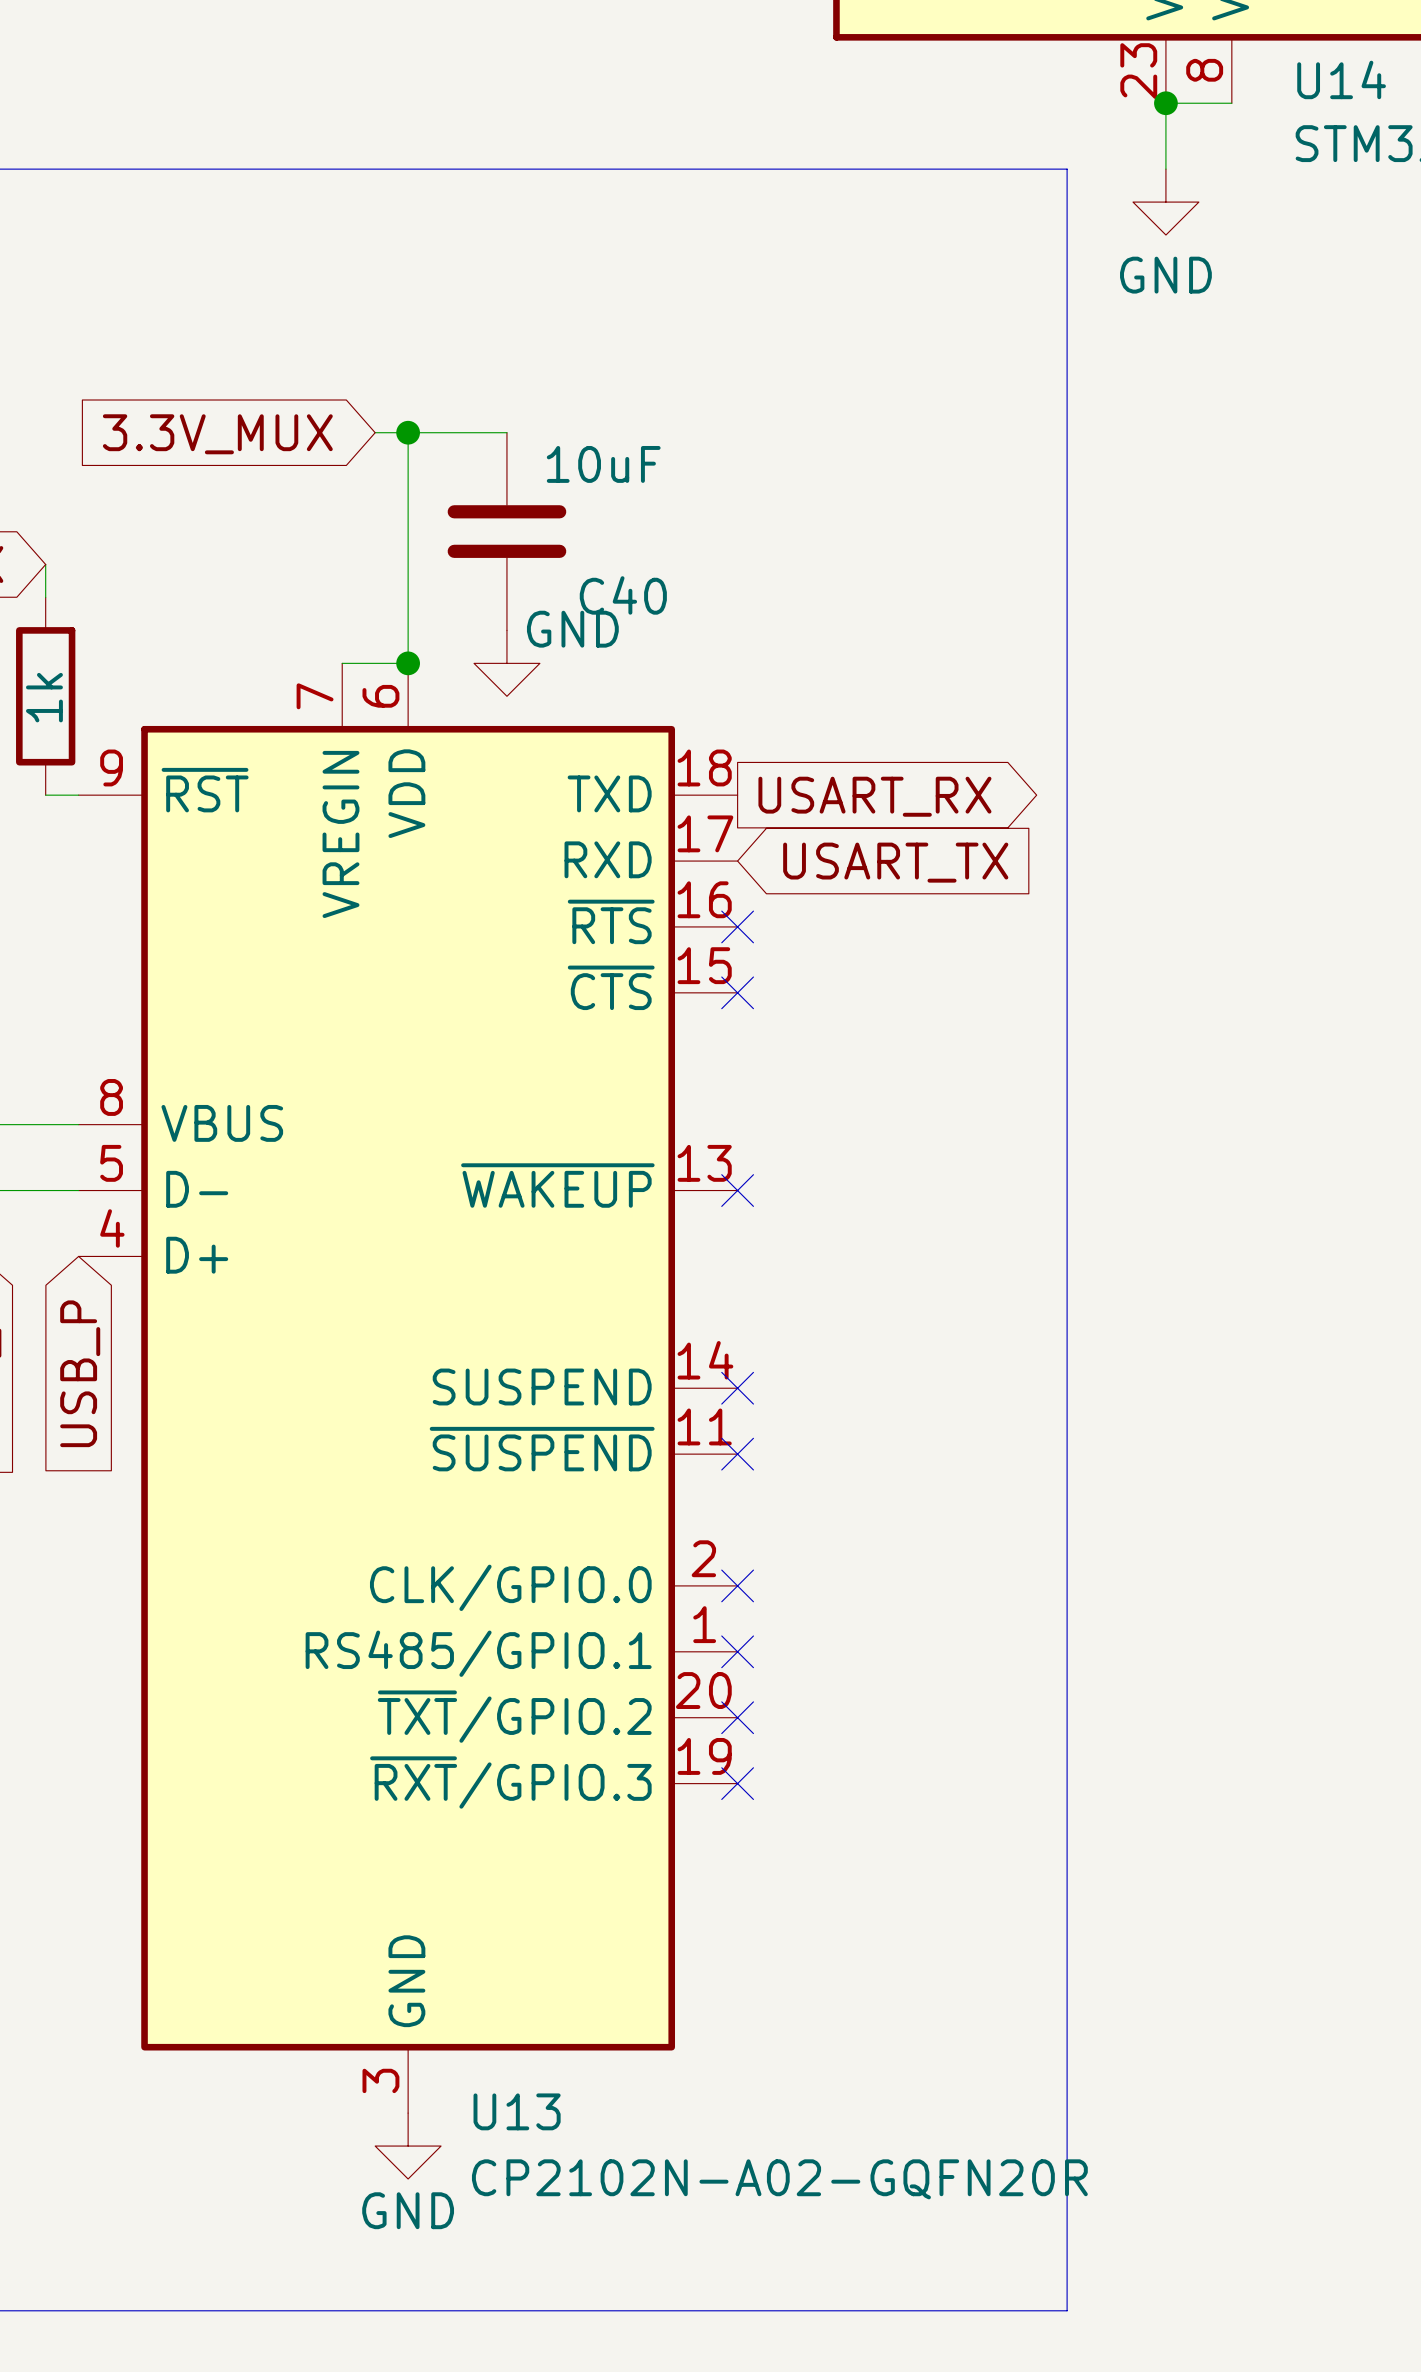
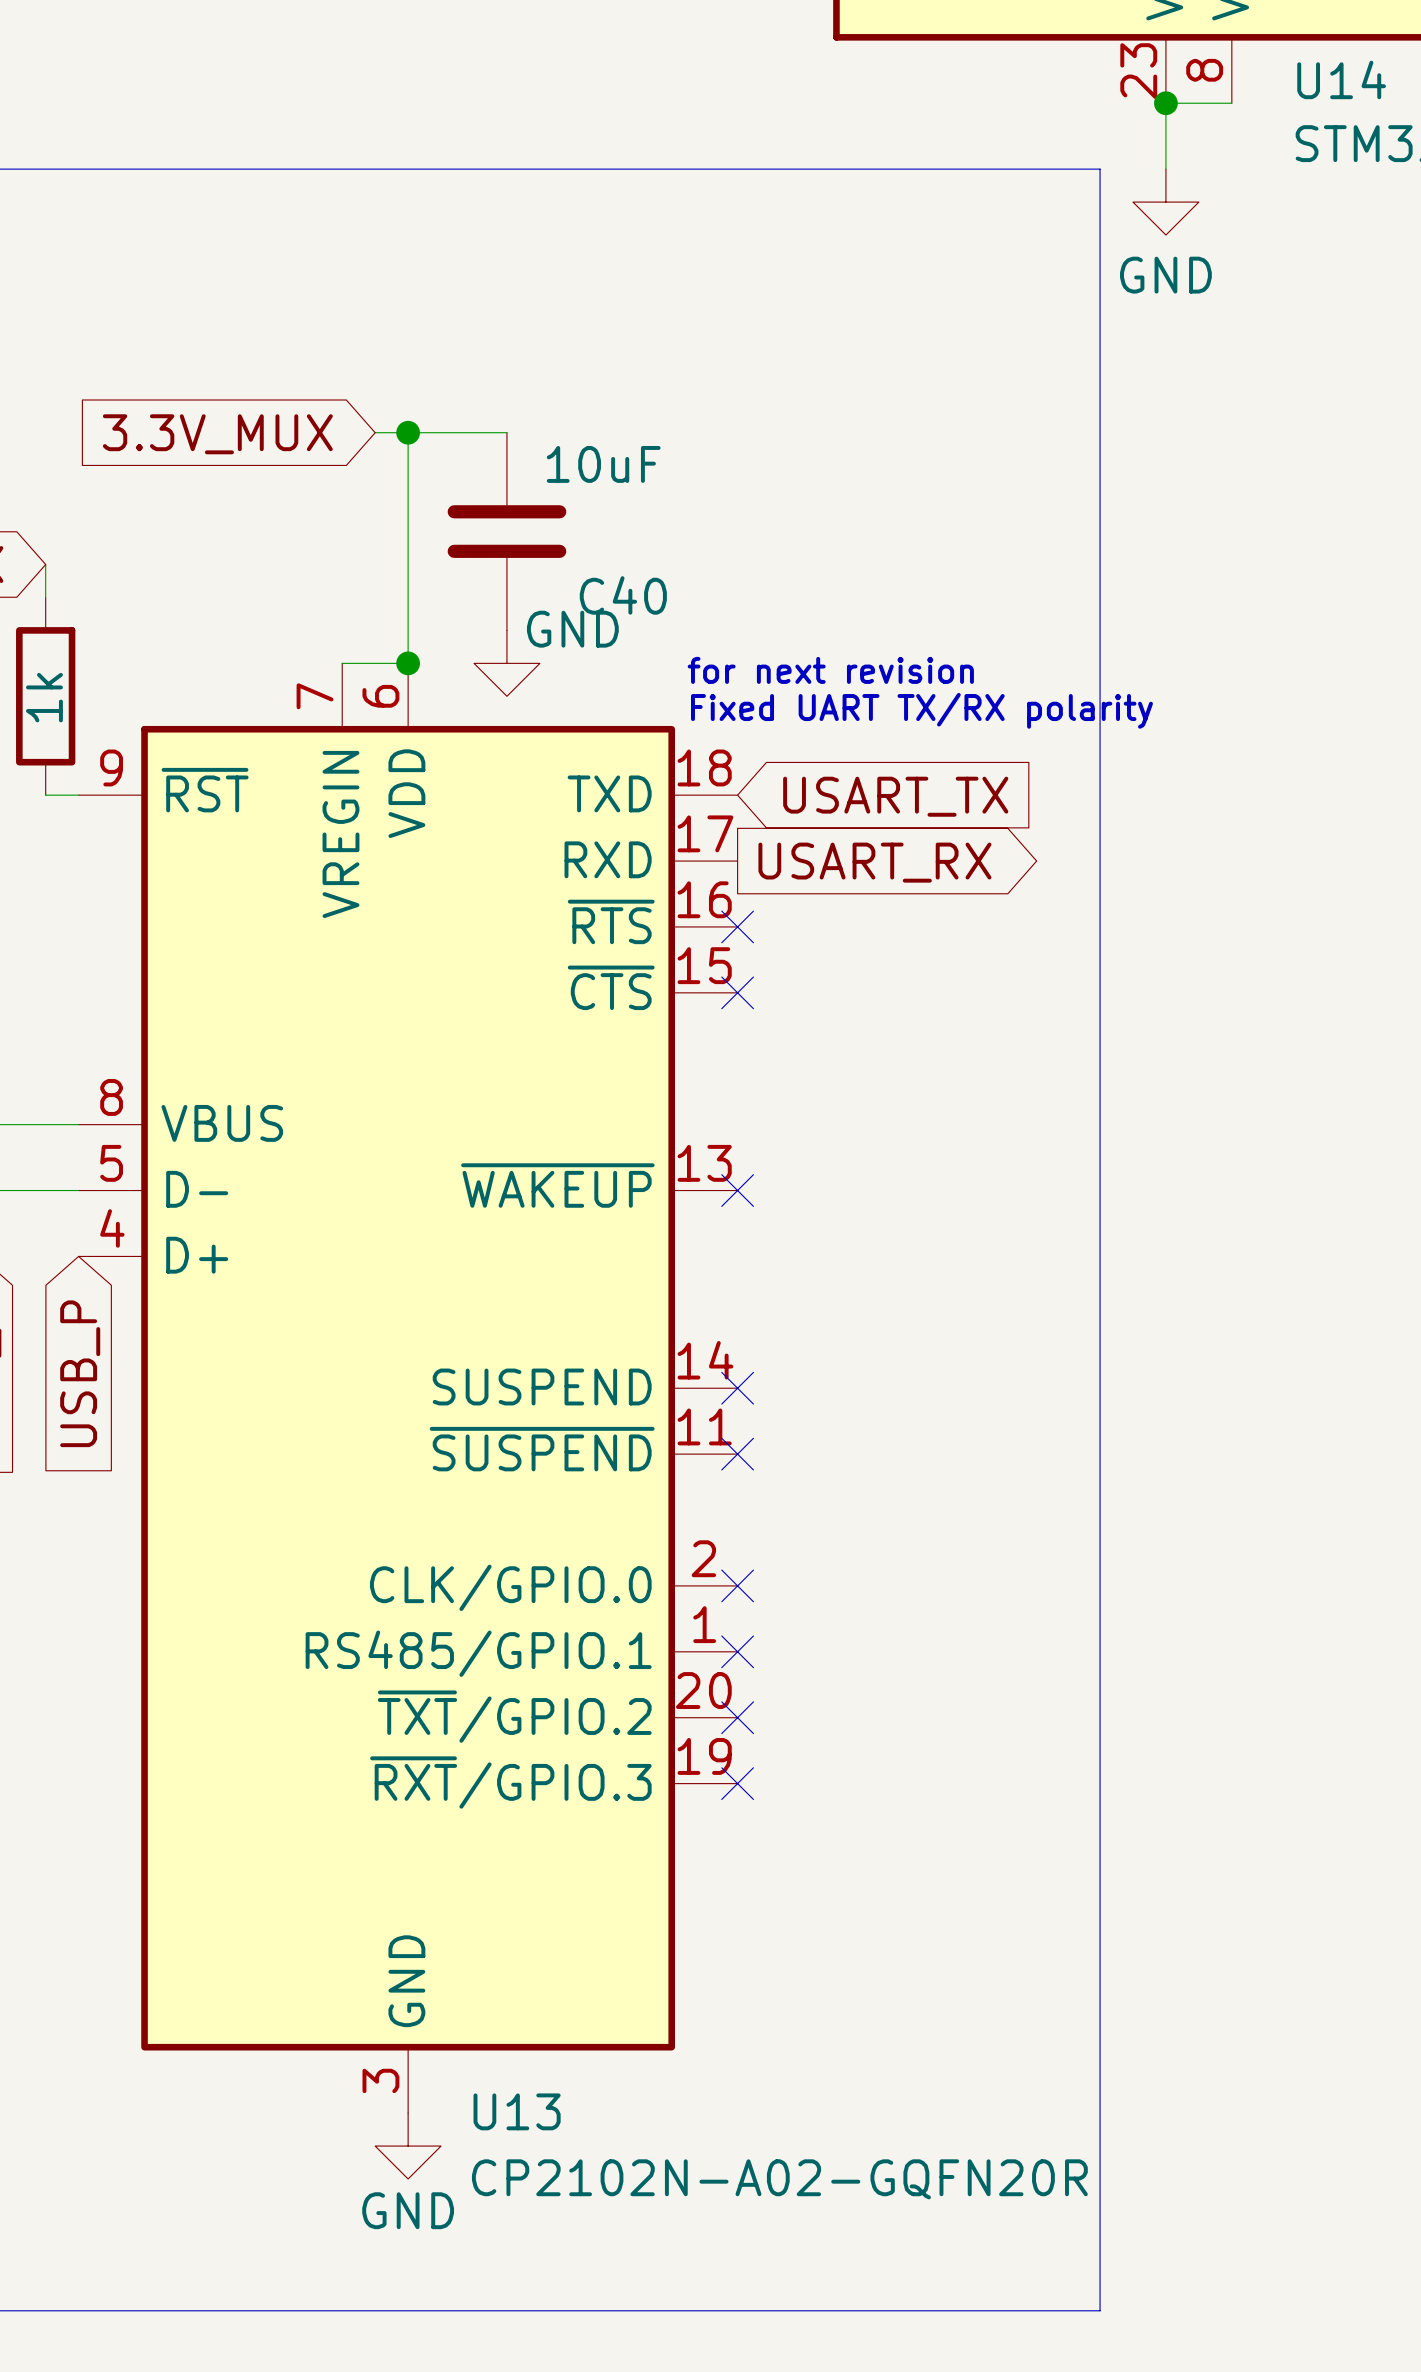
line: (1067, 169) (1067, 2310) -> (1067, 169) (1100, 169) (1100, 2310) (1067, 2310)
text: none -> for next revision (830, 670)
text: none -> Fixed UART TX/RX polarity (921, 710)
global label shape: output (874, 796) -> input (895, 796)
global label: USART_RX (874, 796) -> USART_TX (895, 796)
global label shape: input (895, 862) -> output (874, 862)
global label: USART_TX (895, 862) -> USART_RX (874, 862)

